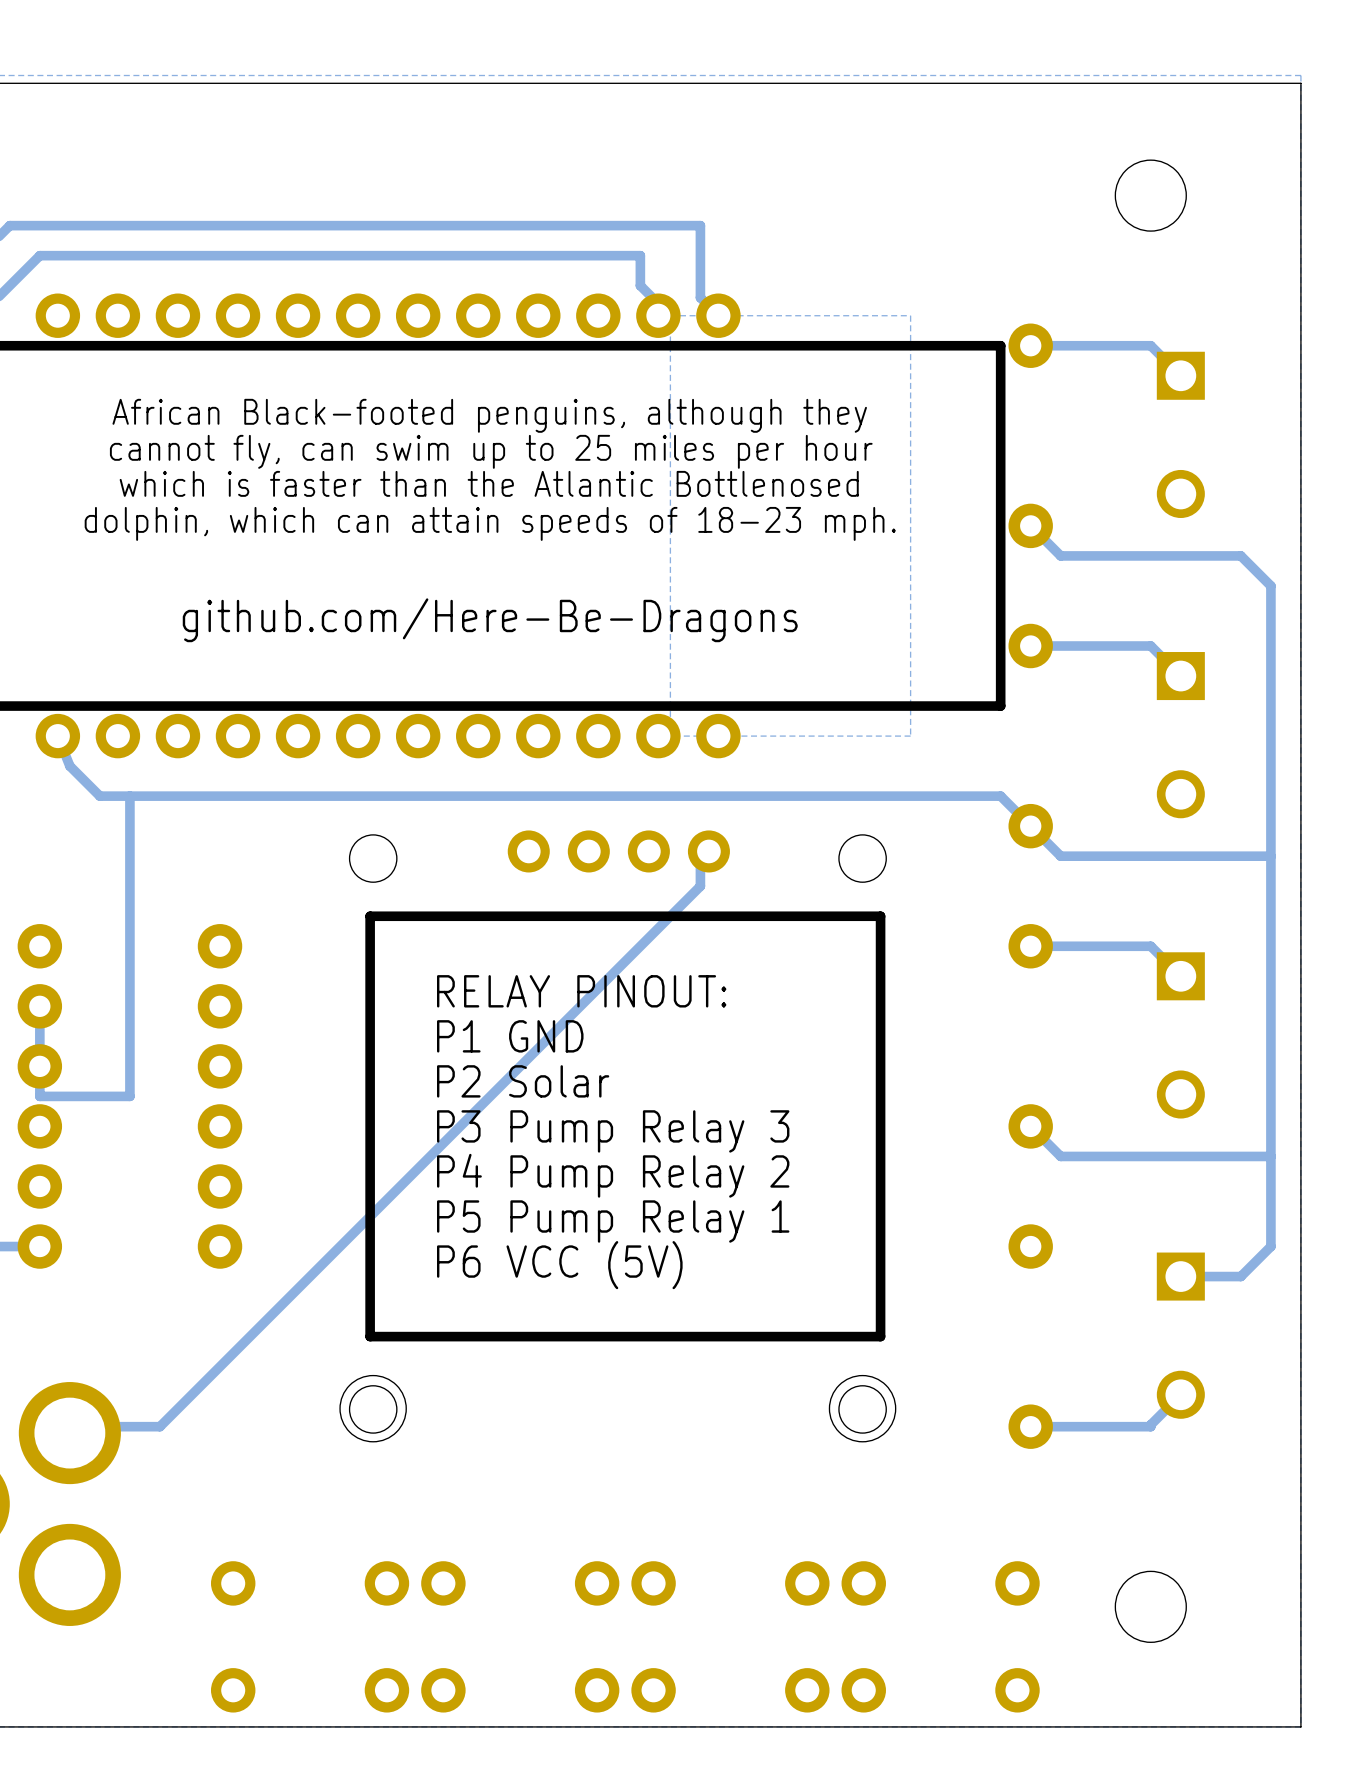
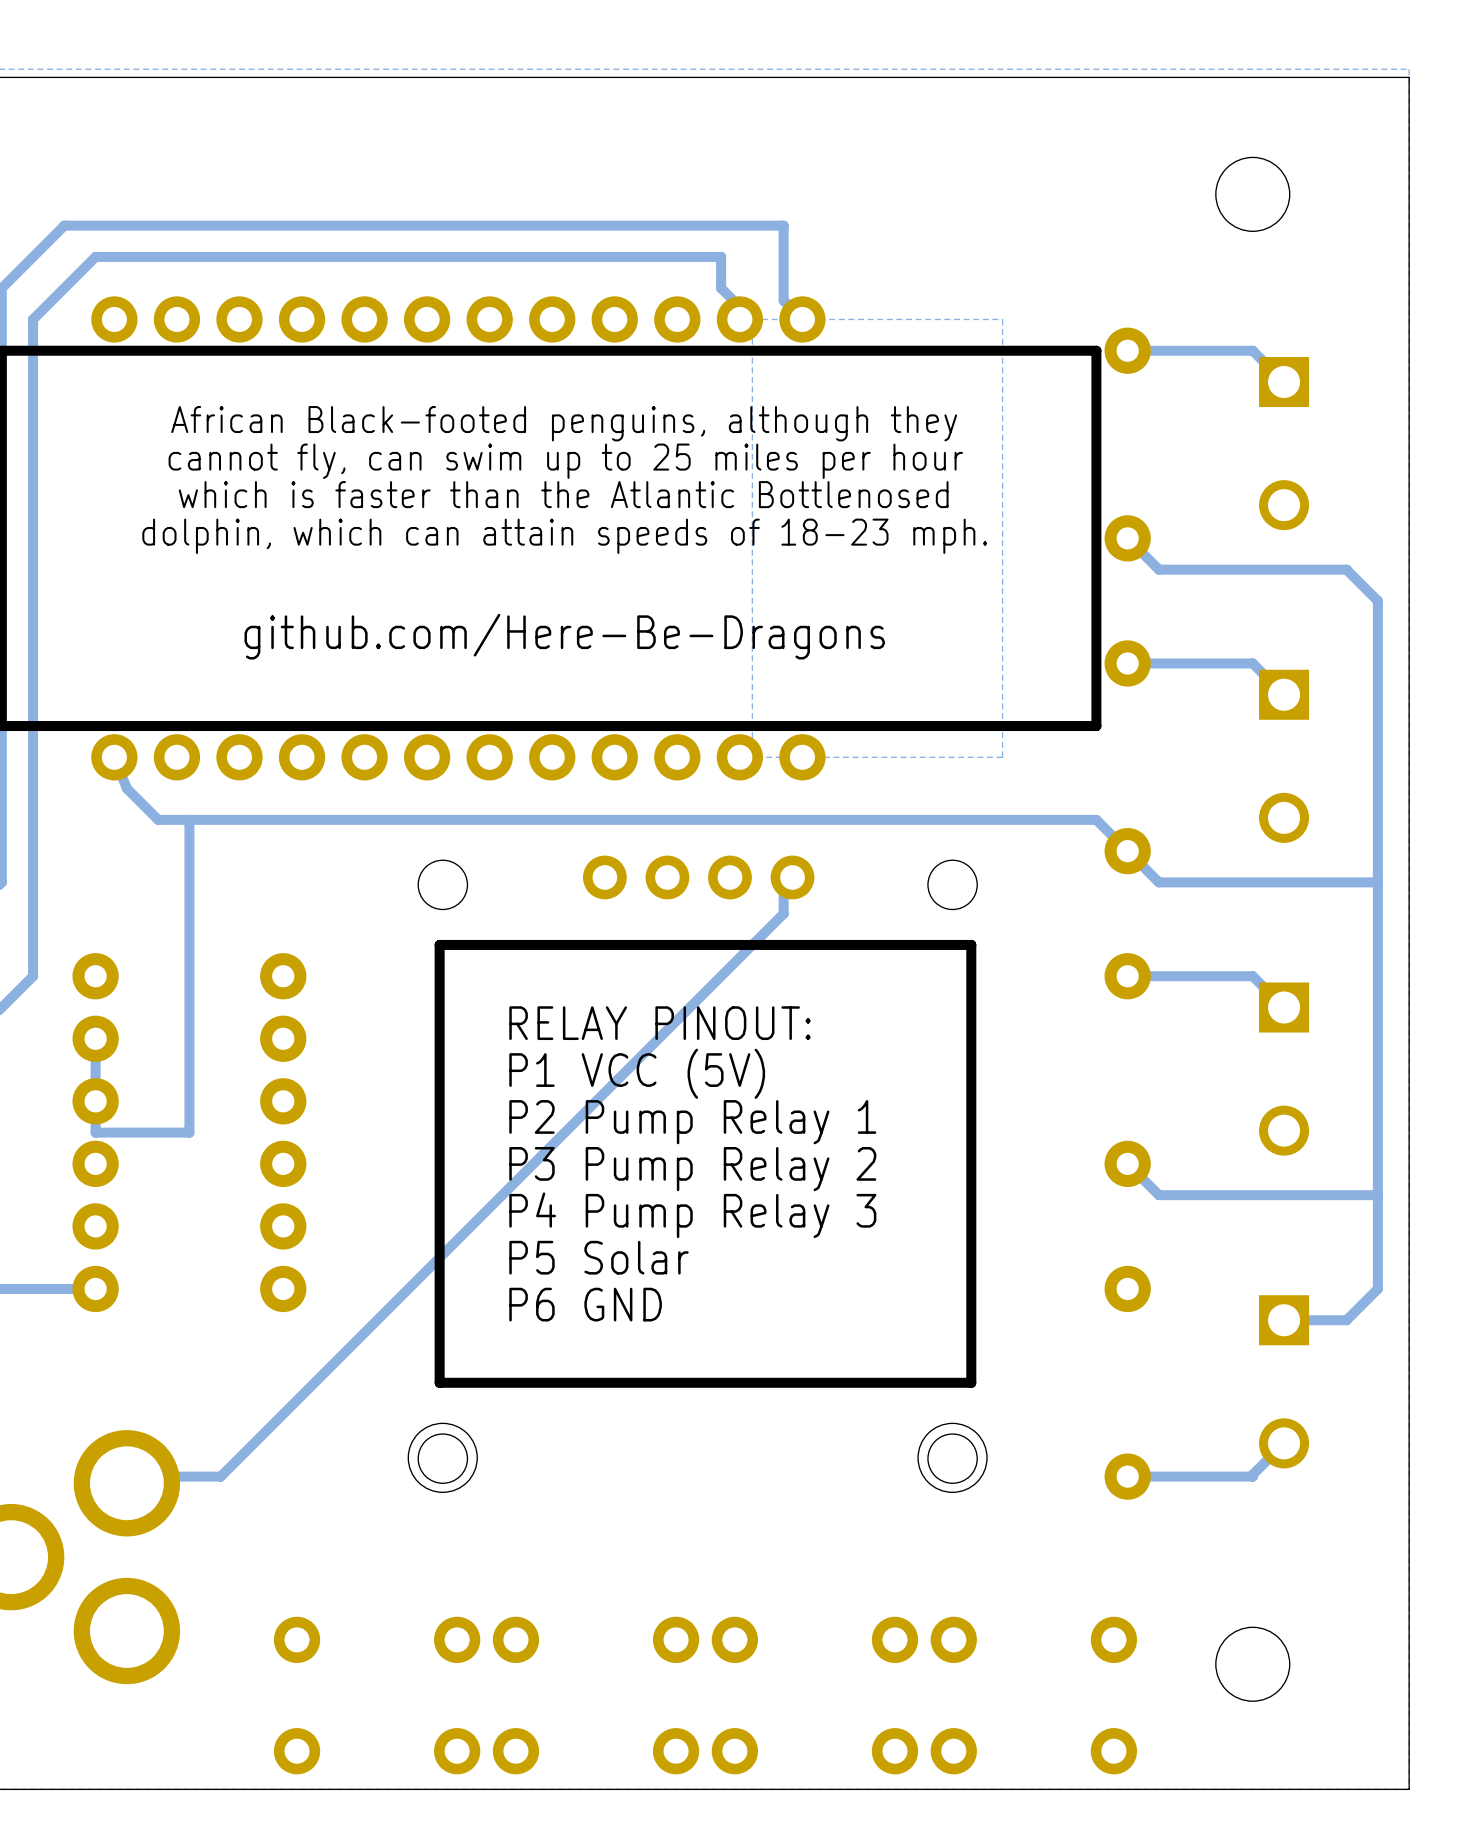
text: P1 GND (510, 1036) -> P1 VCC (5V) (637, 1073)
text: P2 Solar (523, 1081) -> P2 Pump Relay 1 (692, 1122)
text: P3 Pump Relay 3 (613, 1131) -> P3 Pump Relay 2 (692, 1169)
text: P4 Pump Relay 2 (613, 1175) -> P4 Pump Relay 3 (692, 1215)
text: P5 Pump Relay 1 (613, 1221) -> P5 Solar (599, 1257)
text: P6 VCC (5V) (559, 1265) -> P6 GND (585, 1304)

